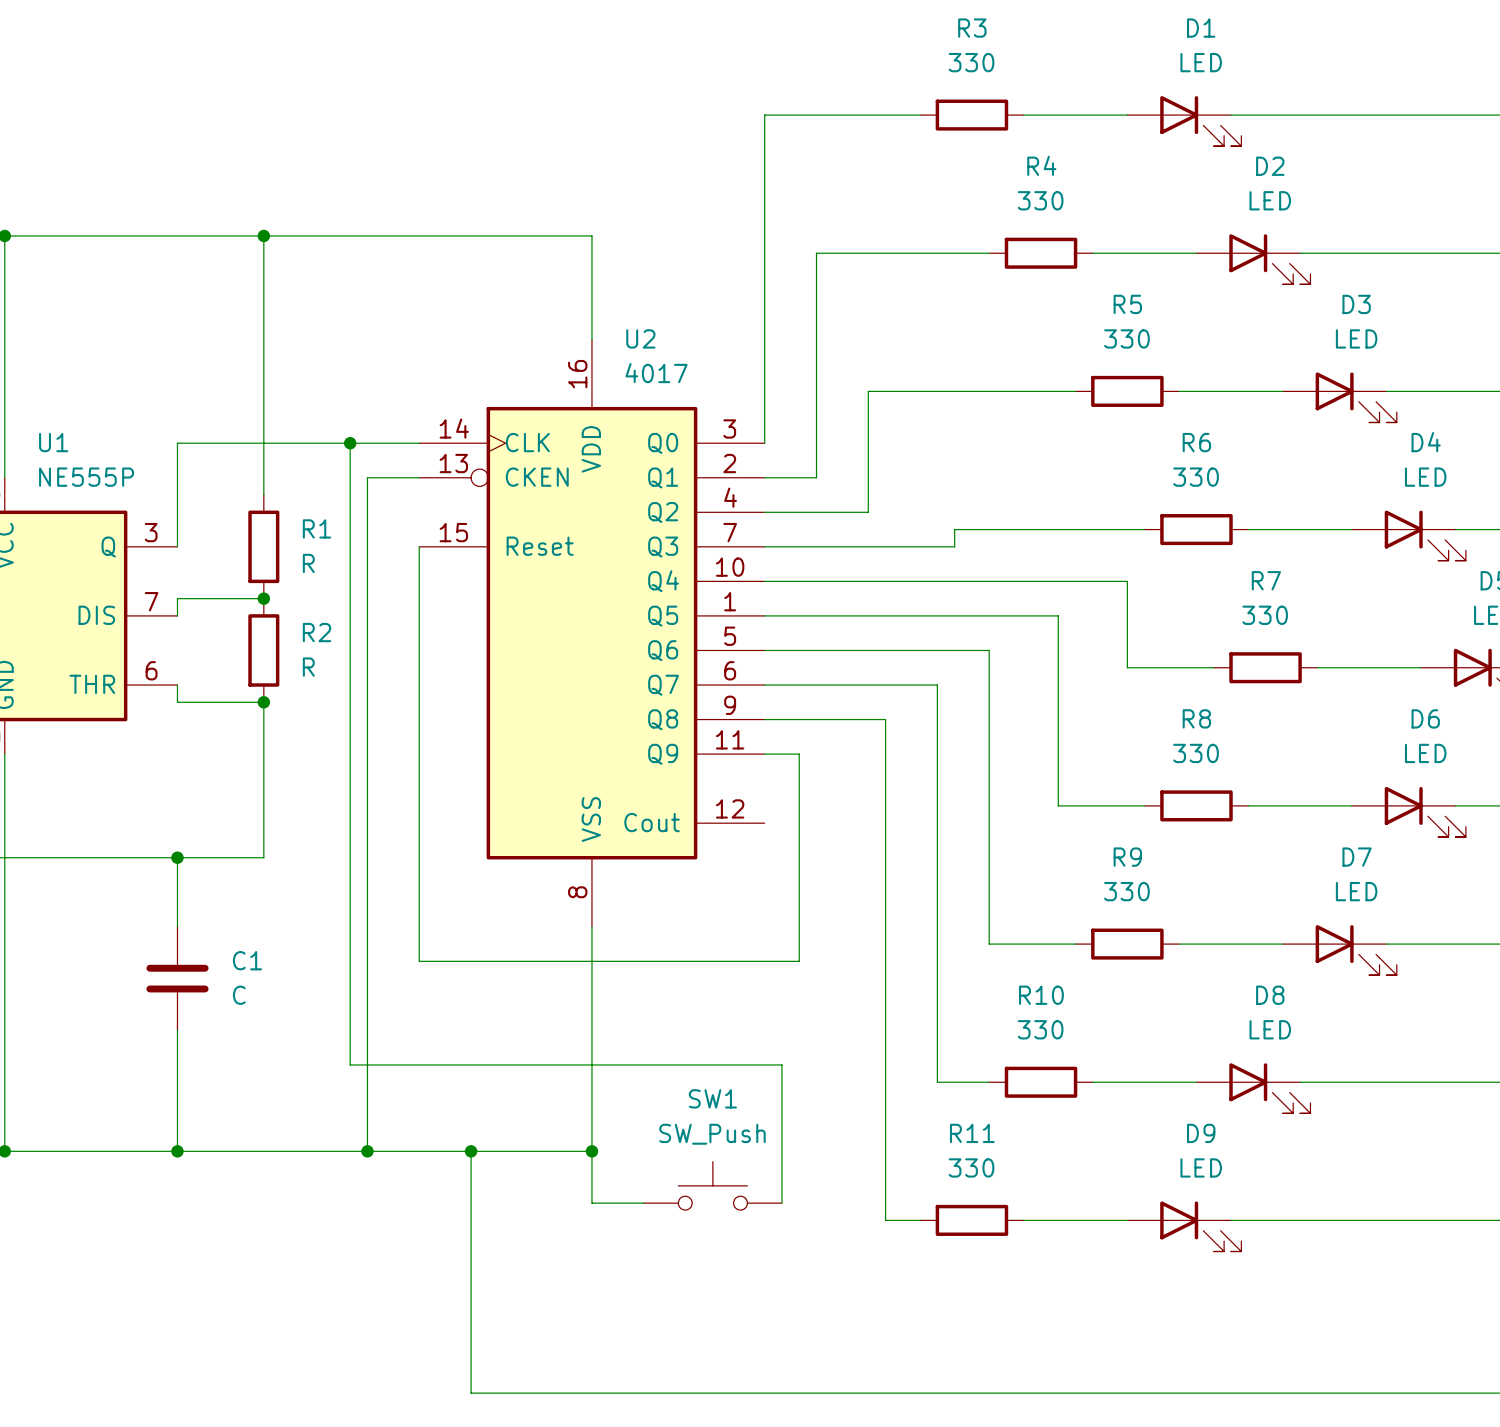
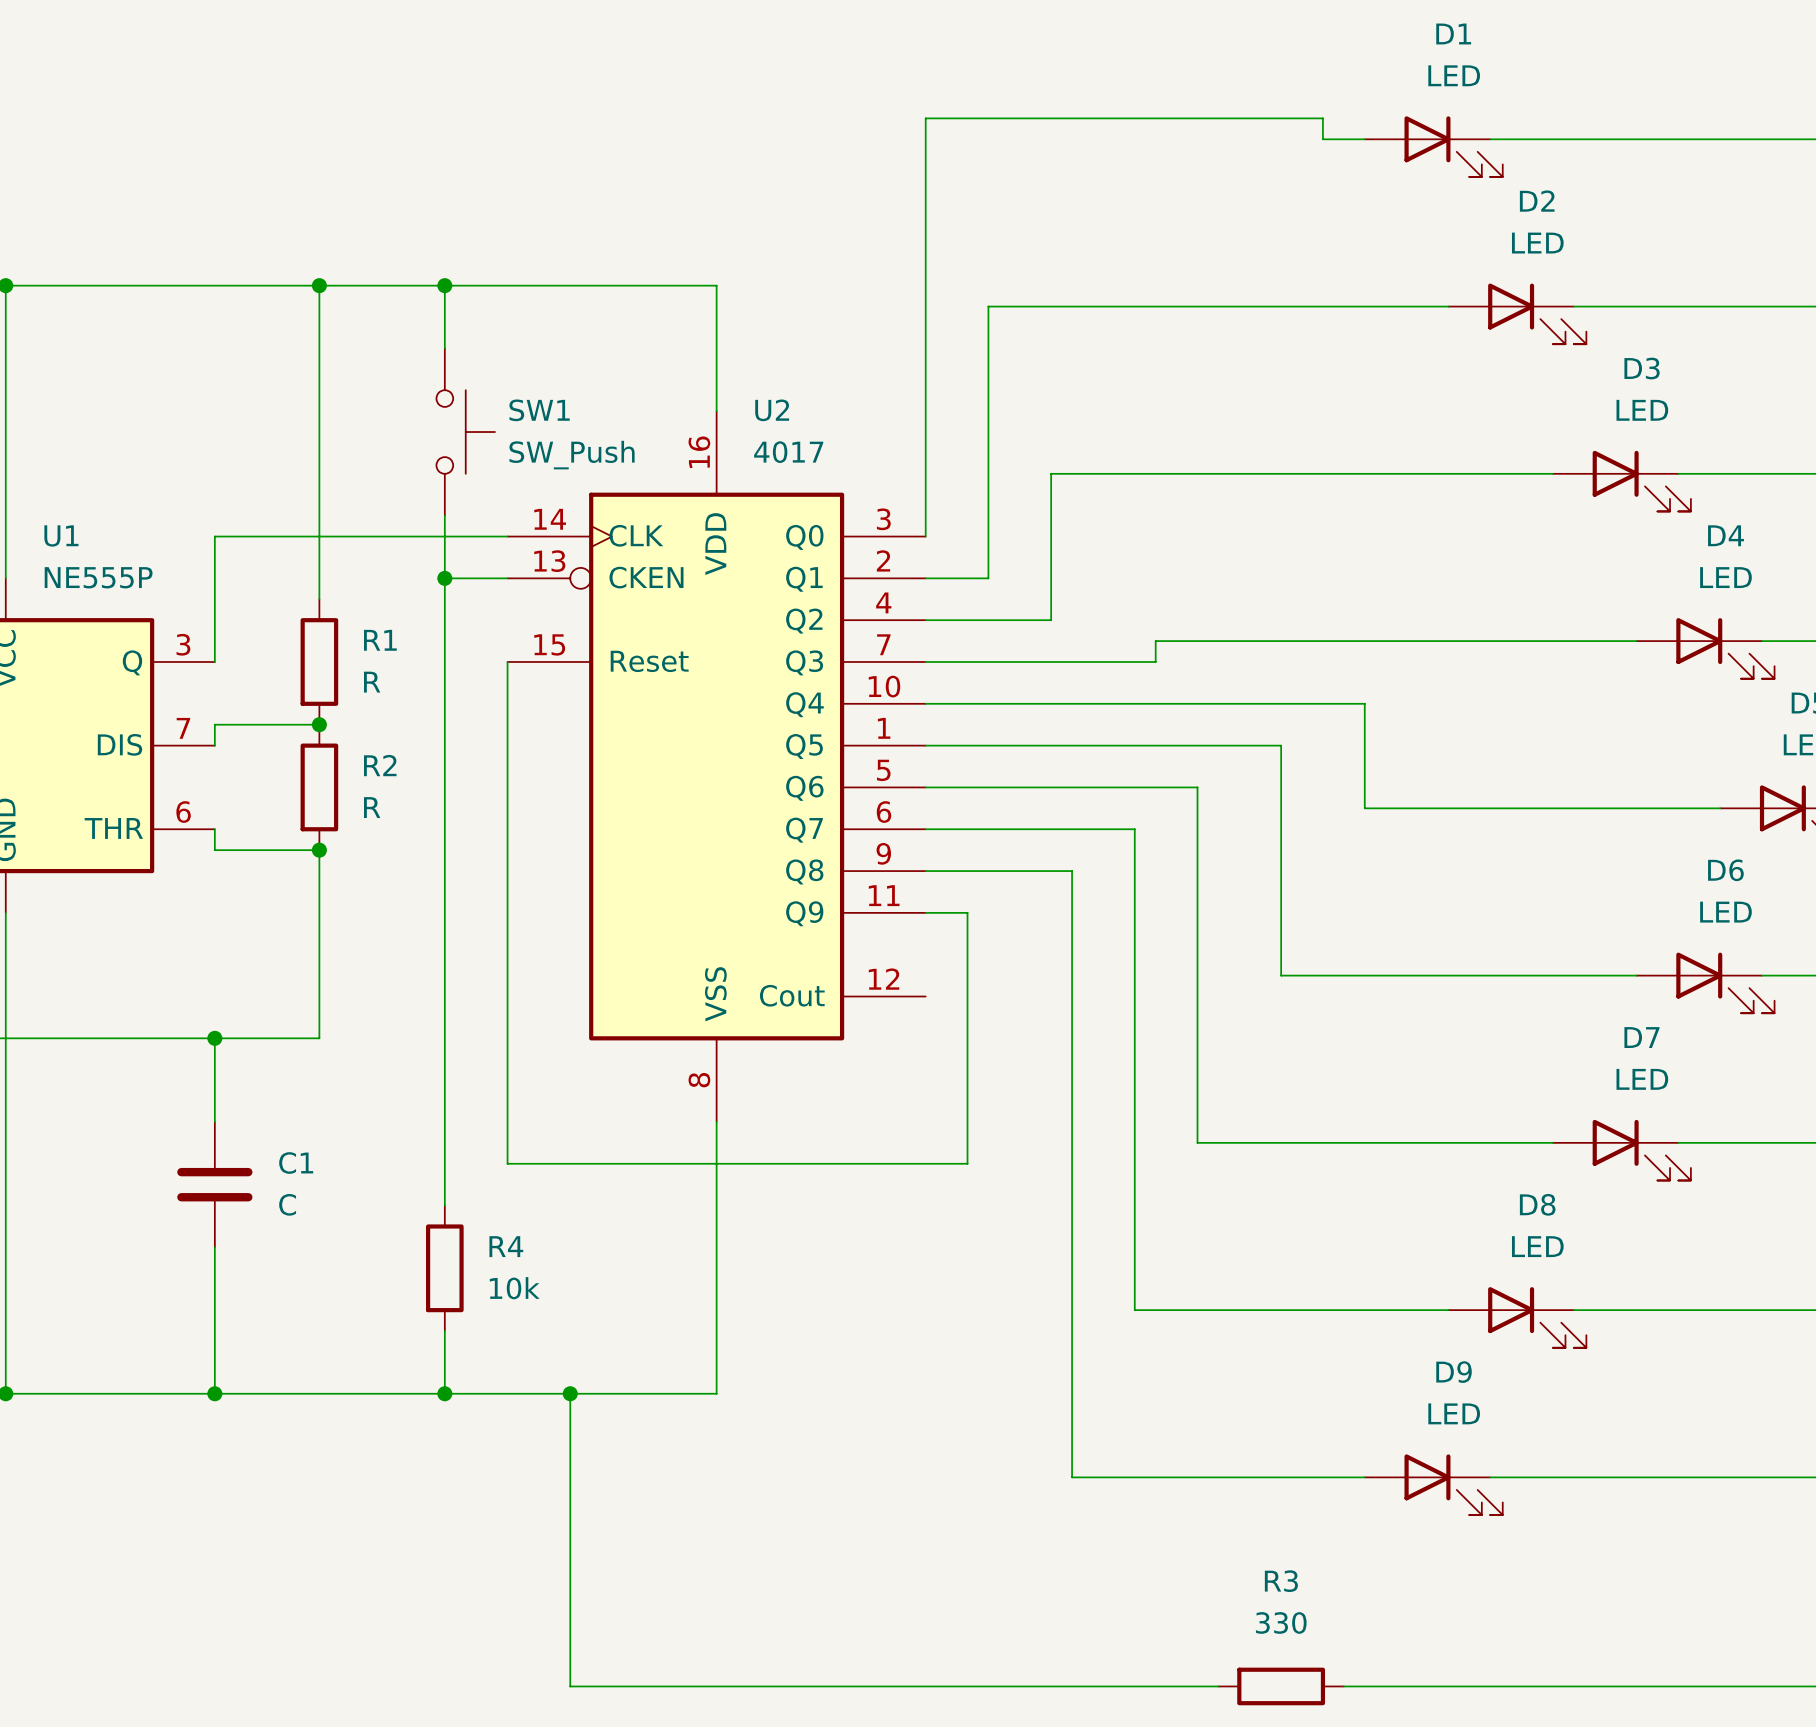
wire: (764, 115) (920, 115) -> (925, 139) (925, 118) (1322, 118) (1322, 139)
R3 position: (971, 115) -> (1281, 1686)
wire: (1023, 115) (1092, 115) -> none
R4 name position: R4 (1041, 165) -> R4 (506, 1246)
R4 value: 330 (1040, 200) -> 10k (514, 1288)
wire: none -> (444, 285) (444, 348)
junction: none -> (444, 285)
wire: none -> (1197, 306) (1322, 306)
R4 rotation: 0° (1041, 253) -> 90° clockwise (444, 1268)
R4 position: (1041, 253) -> (444, 1268)
wire: none -> (1302, 473) (1427, 473)
R5: 330 (1127, 391) -> none
wire: none -> (444, 515) (444, 578)
wire: (350, 443) (350, 1064) (781, 1064) (781, 1203) -> none
junction position: (350, 443) -> (444, 578)
wire: none -> (1385, 641) (1511, 641)
R6: 330 (1196, 529) -> none
wire: none -> (1469, 808) (1594, 808)
R7: 330 (1265, 667) -> none
wire: none -> (1385, 975) (1511, 975)
R8: 330 (1196, 805) -> none
wire: none -> (1302, 1142) (1427, 1142)
R9: 330 (1127, 944) -> none
wire: (367, 995) (367, 1099) -> none
wire: none -> (1197, 1310) (1322, 1310)
R10: 330 (1041, 1082) -> none
SW1 value position: SW_Push (712, 1134) -> SW_Push (572, 455)
wire: (591, 1151) (591, 1203) (643, 1203) -> none
junction: (591, 1151) -> none
SW1 rotation: 0° (712, 1185) -> 90° clockwise (465, 432)
SW1 position: (712, 1185) -> (465, 432)
R11: 330 (971, 1220) -> none
wire: (1006, 1393) (1110, 1393) -> (1113, 1477) (1239, 1477)

